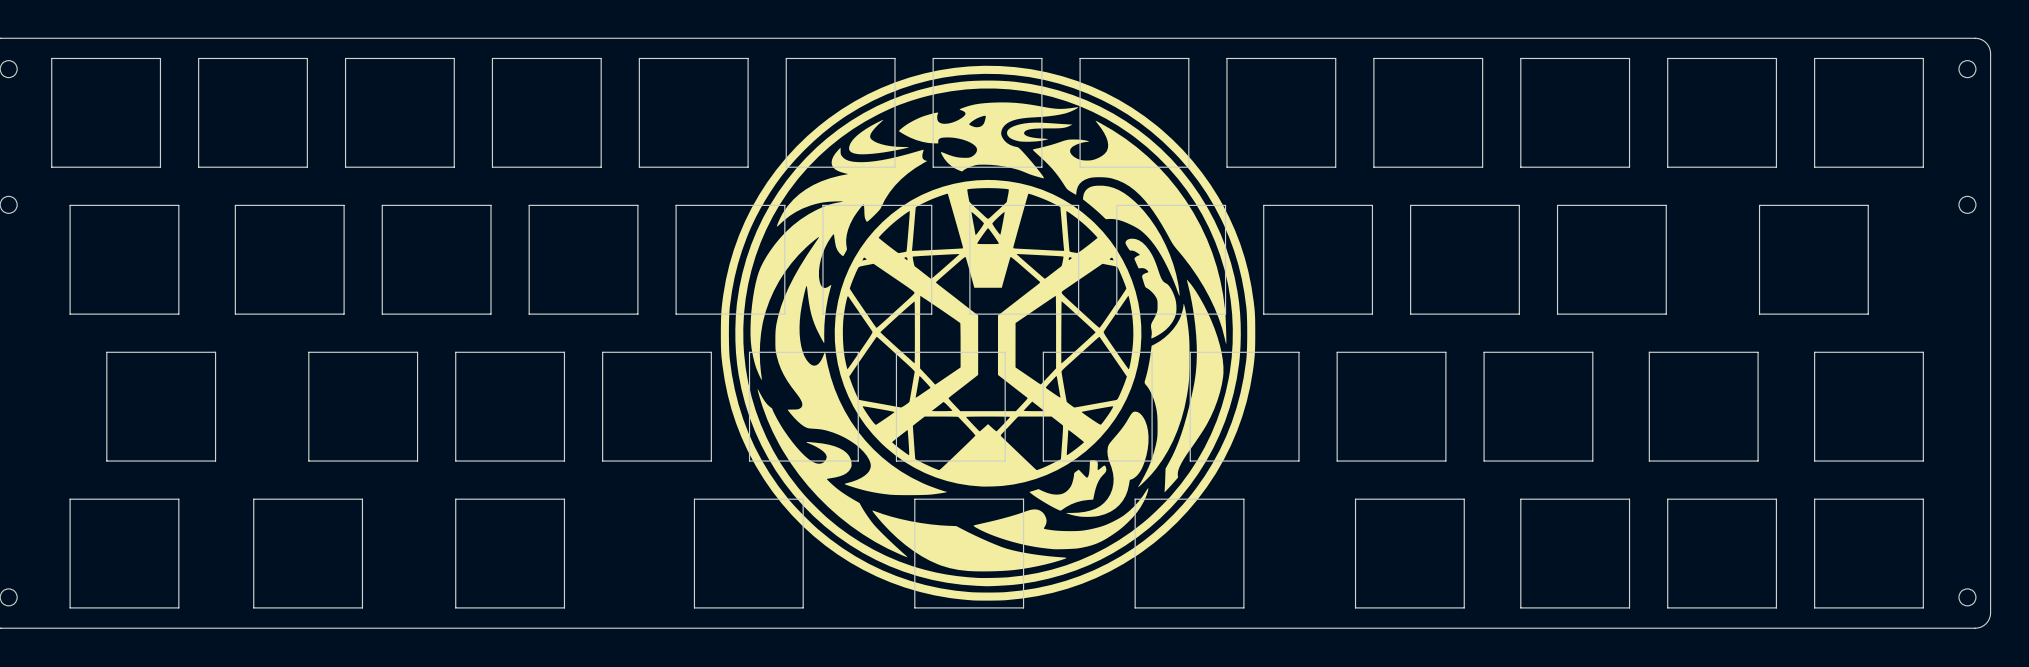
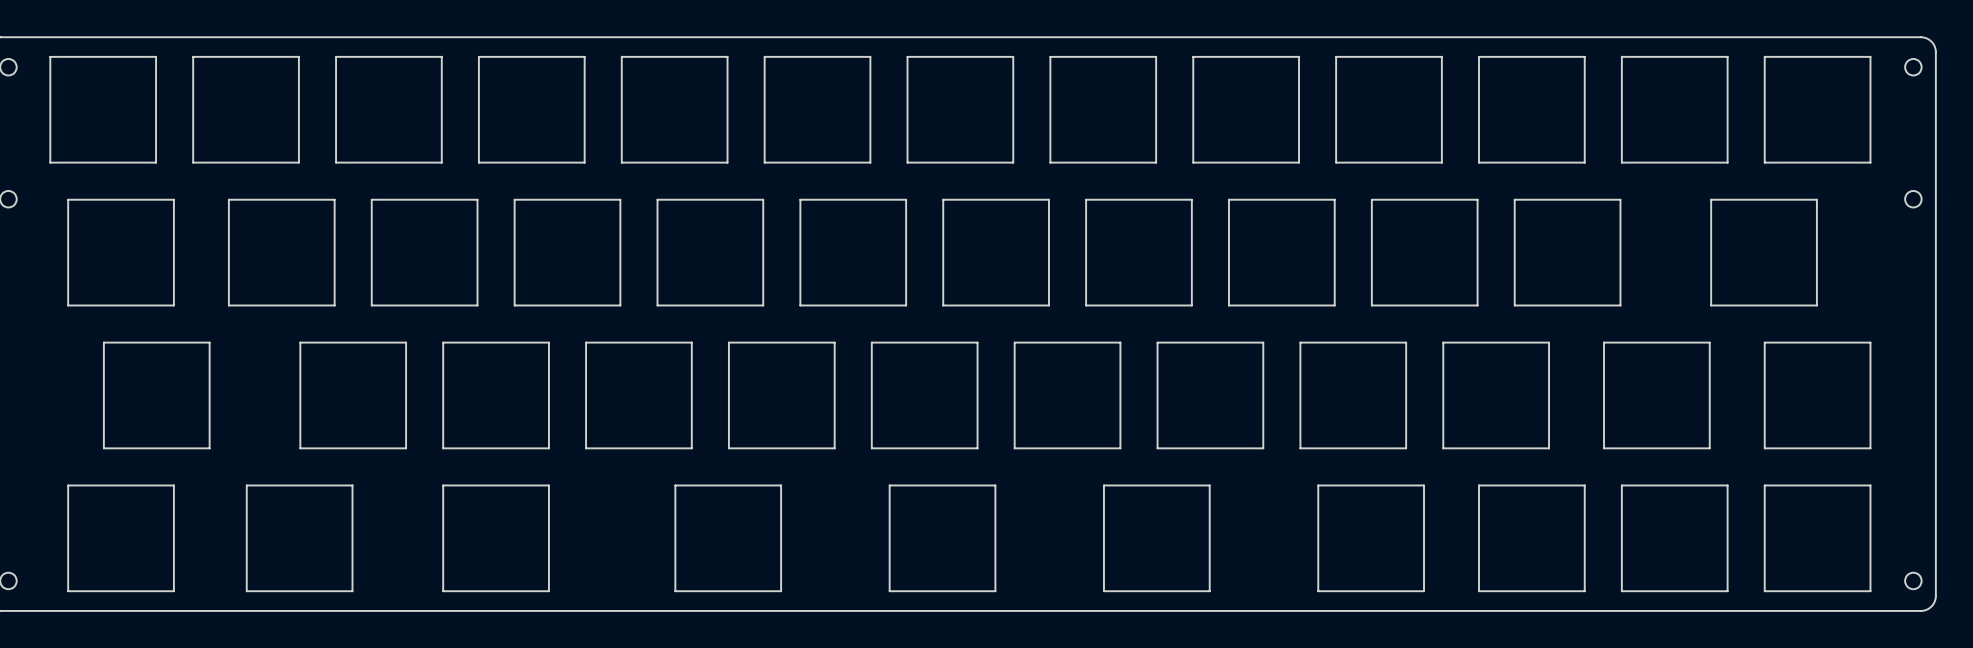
drawing: [720, 65, 1256, 601] -> none

